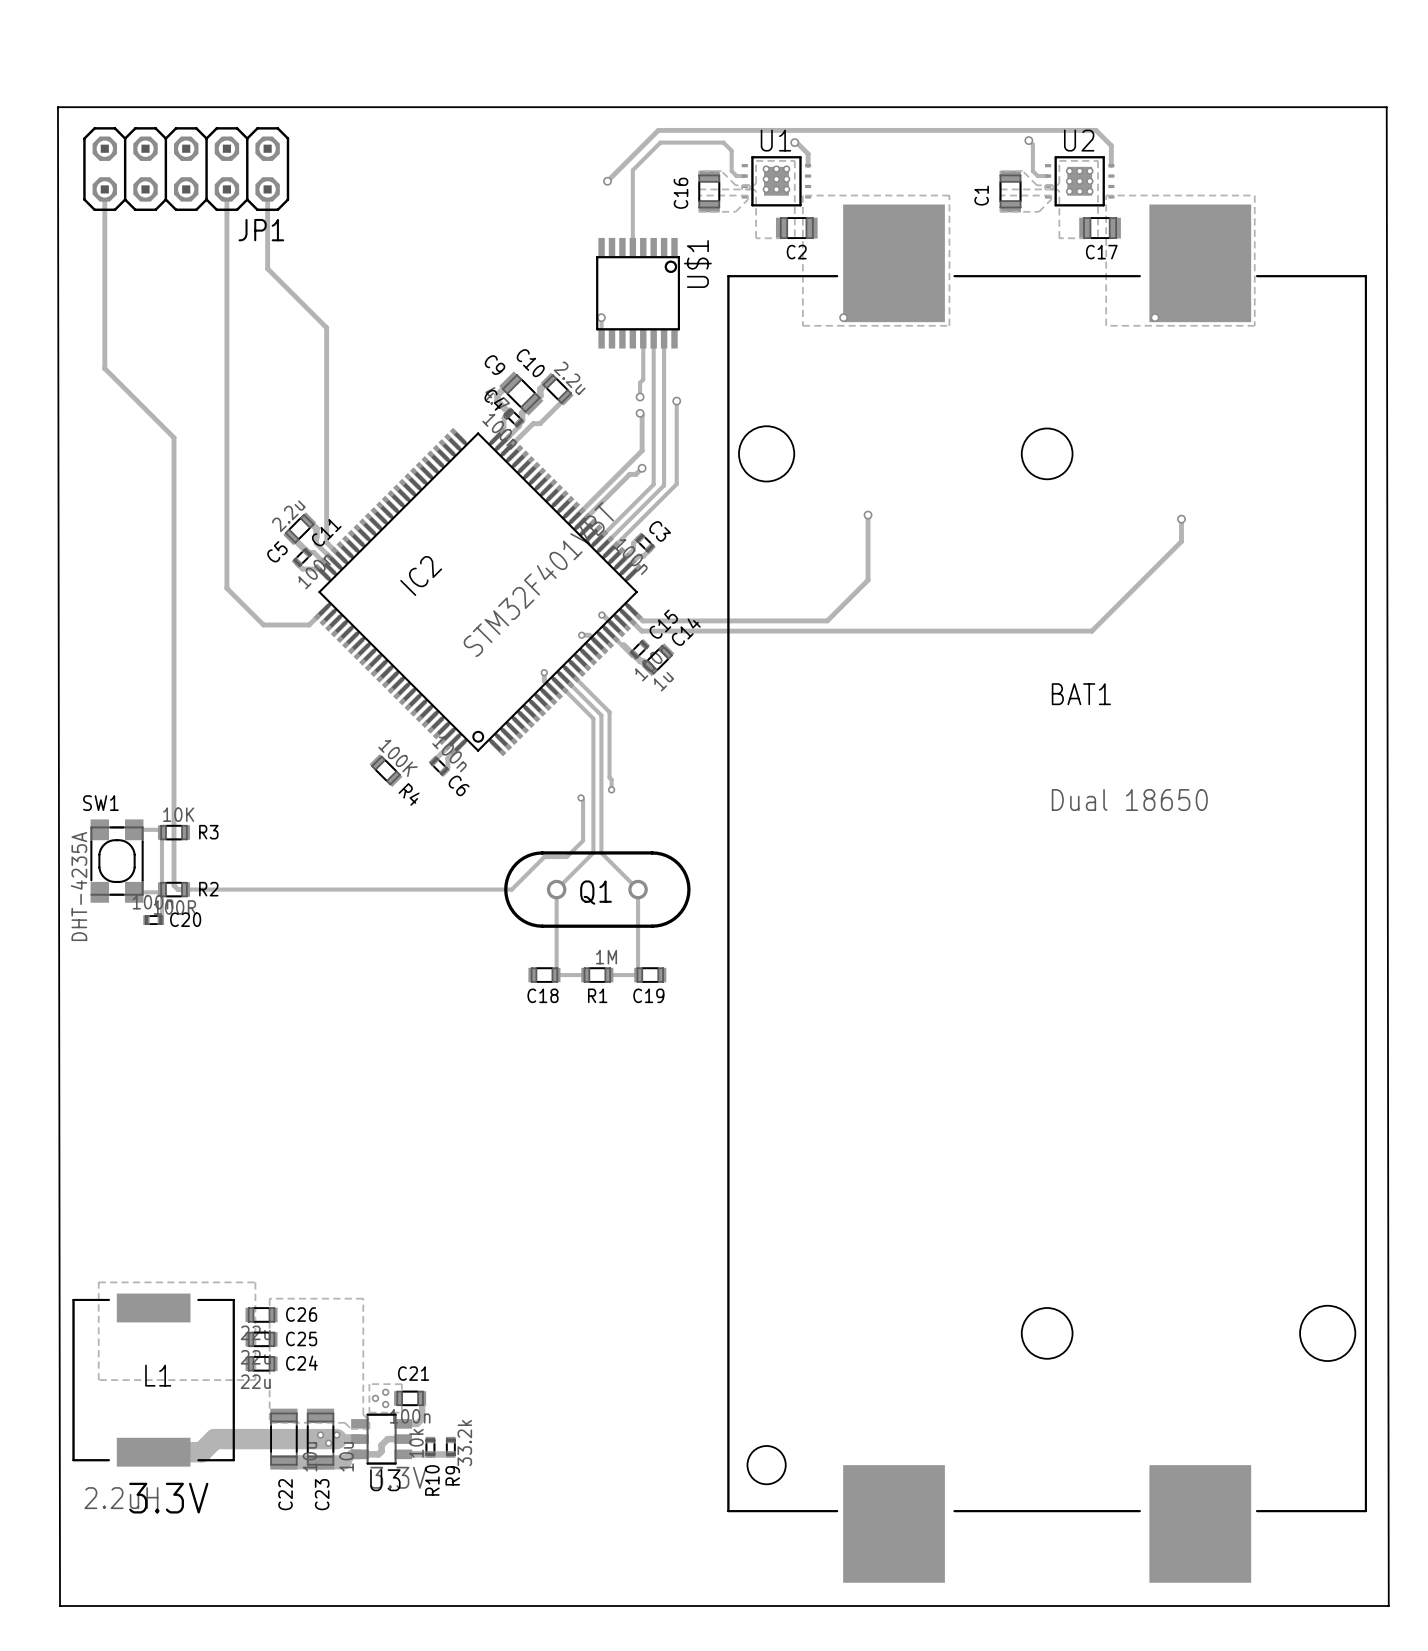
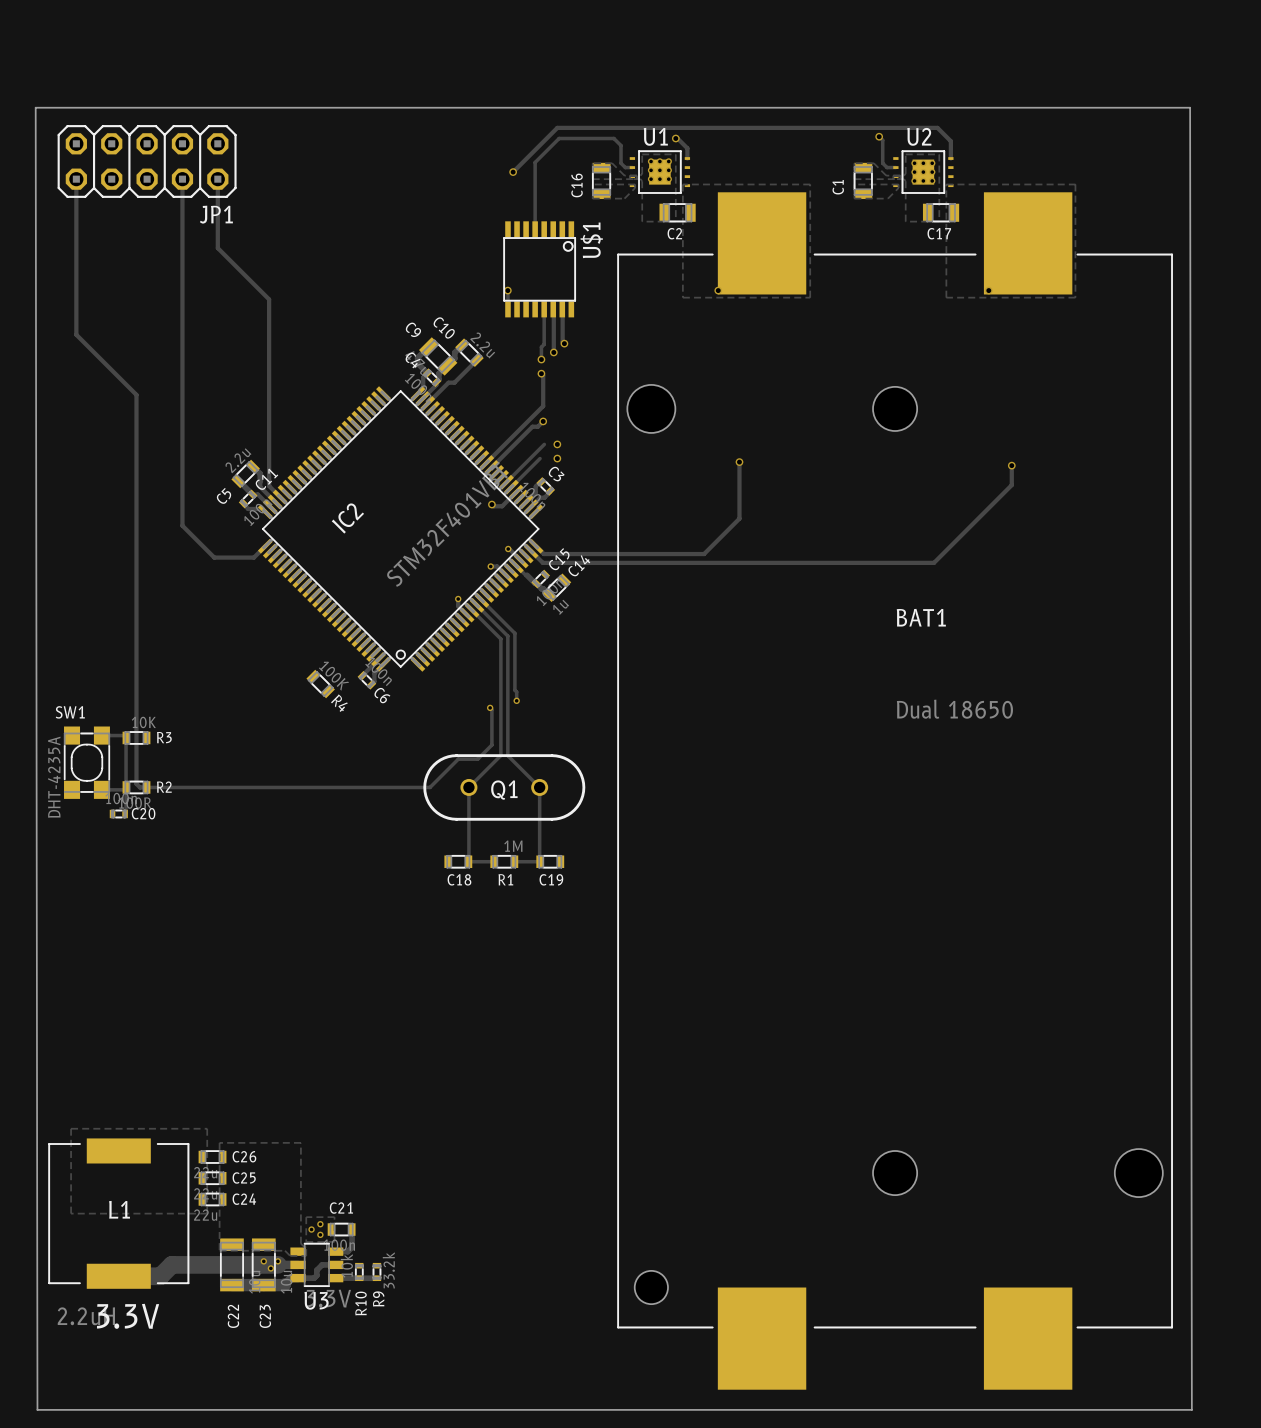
track: (653, 338) (653, 484) (643, 494) -> (553, 309) (553, 352)
track: (664, 338) (664, 485) (638, 511) -> (562, 309) (562, 341) (564, 343)
via: none -> (564, 343)
via: none -> (553, 352)
track: (676, 401) (676, 484) (611, 549) -> (491, 504) (502, 506) (516, 492)
via: (676, 401) -> none
via: none -> (557, 444)
via: none -> (557, 458)
via: none -> (491, 504)

